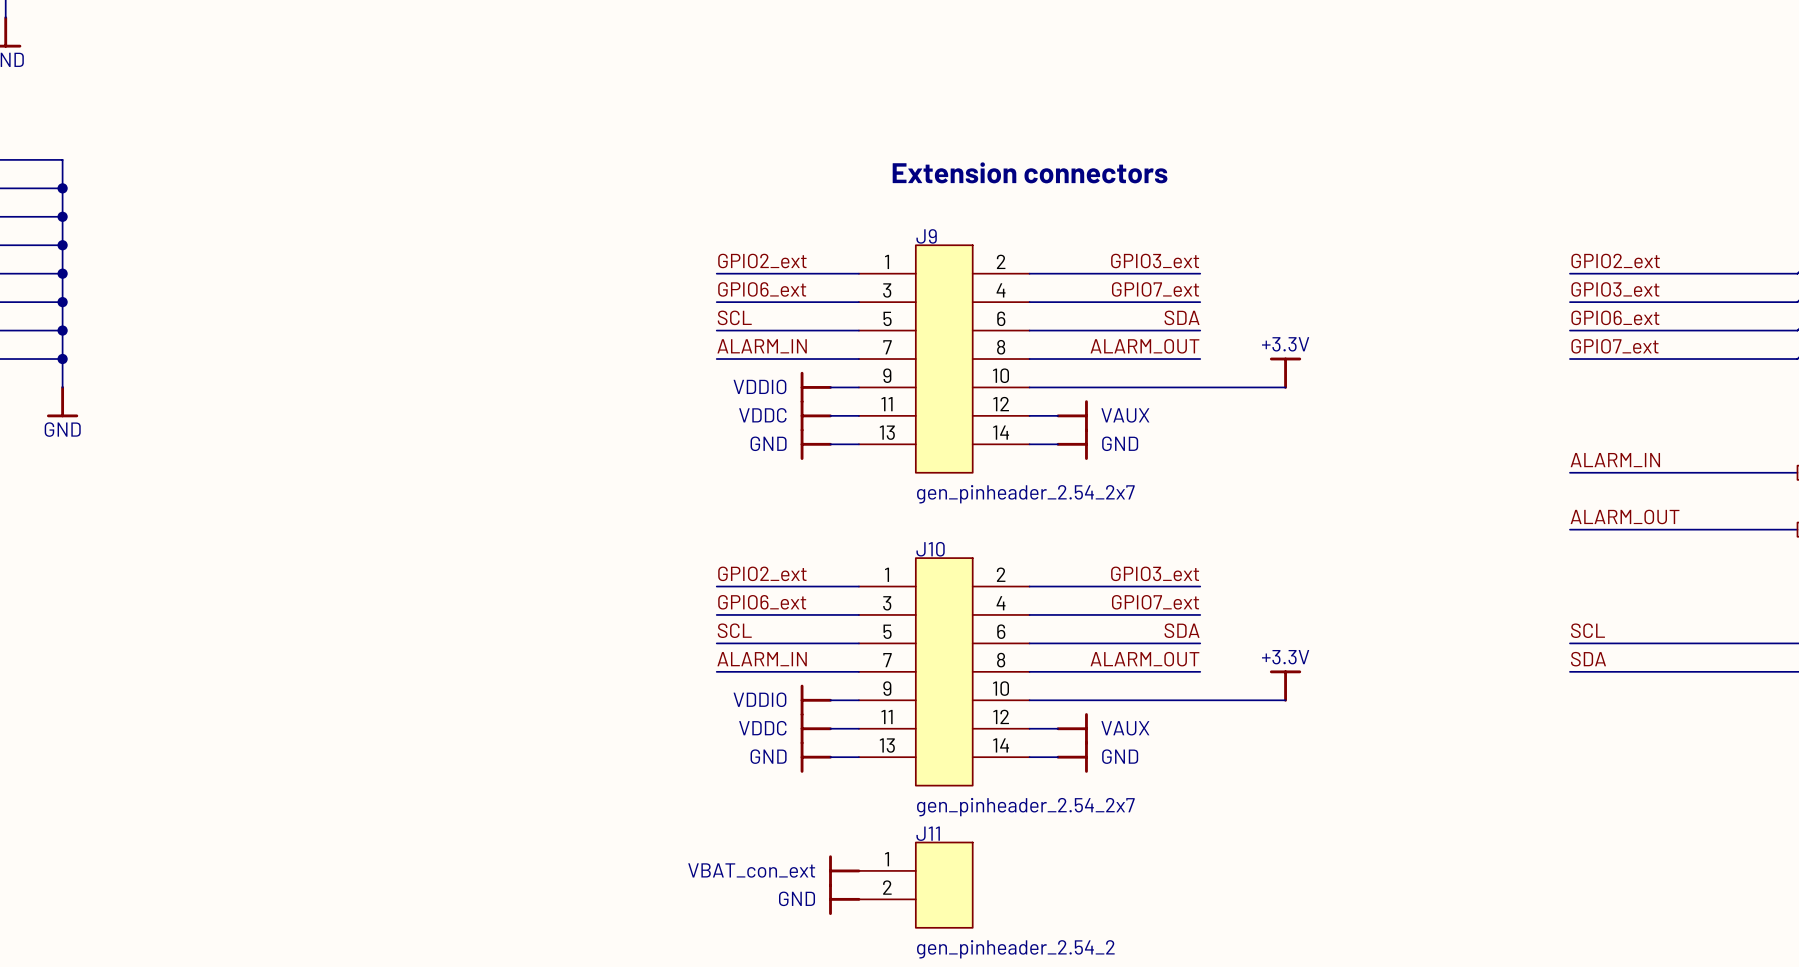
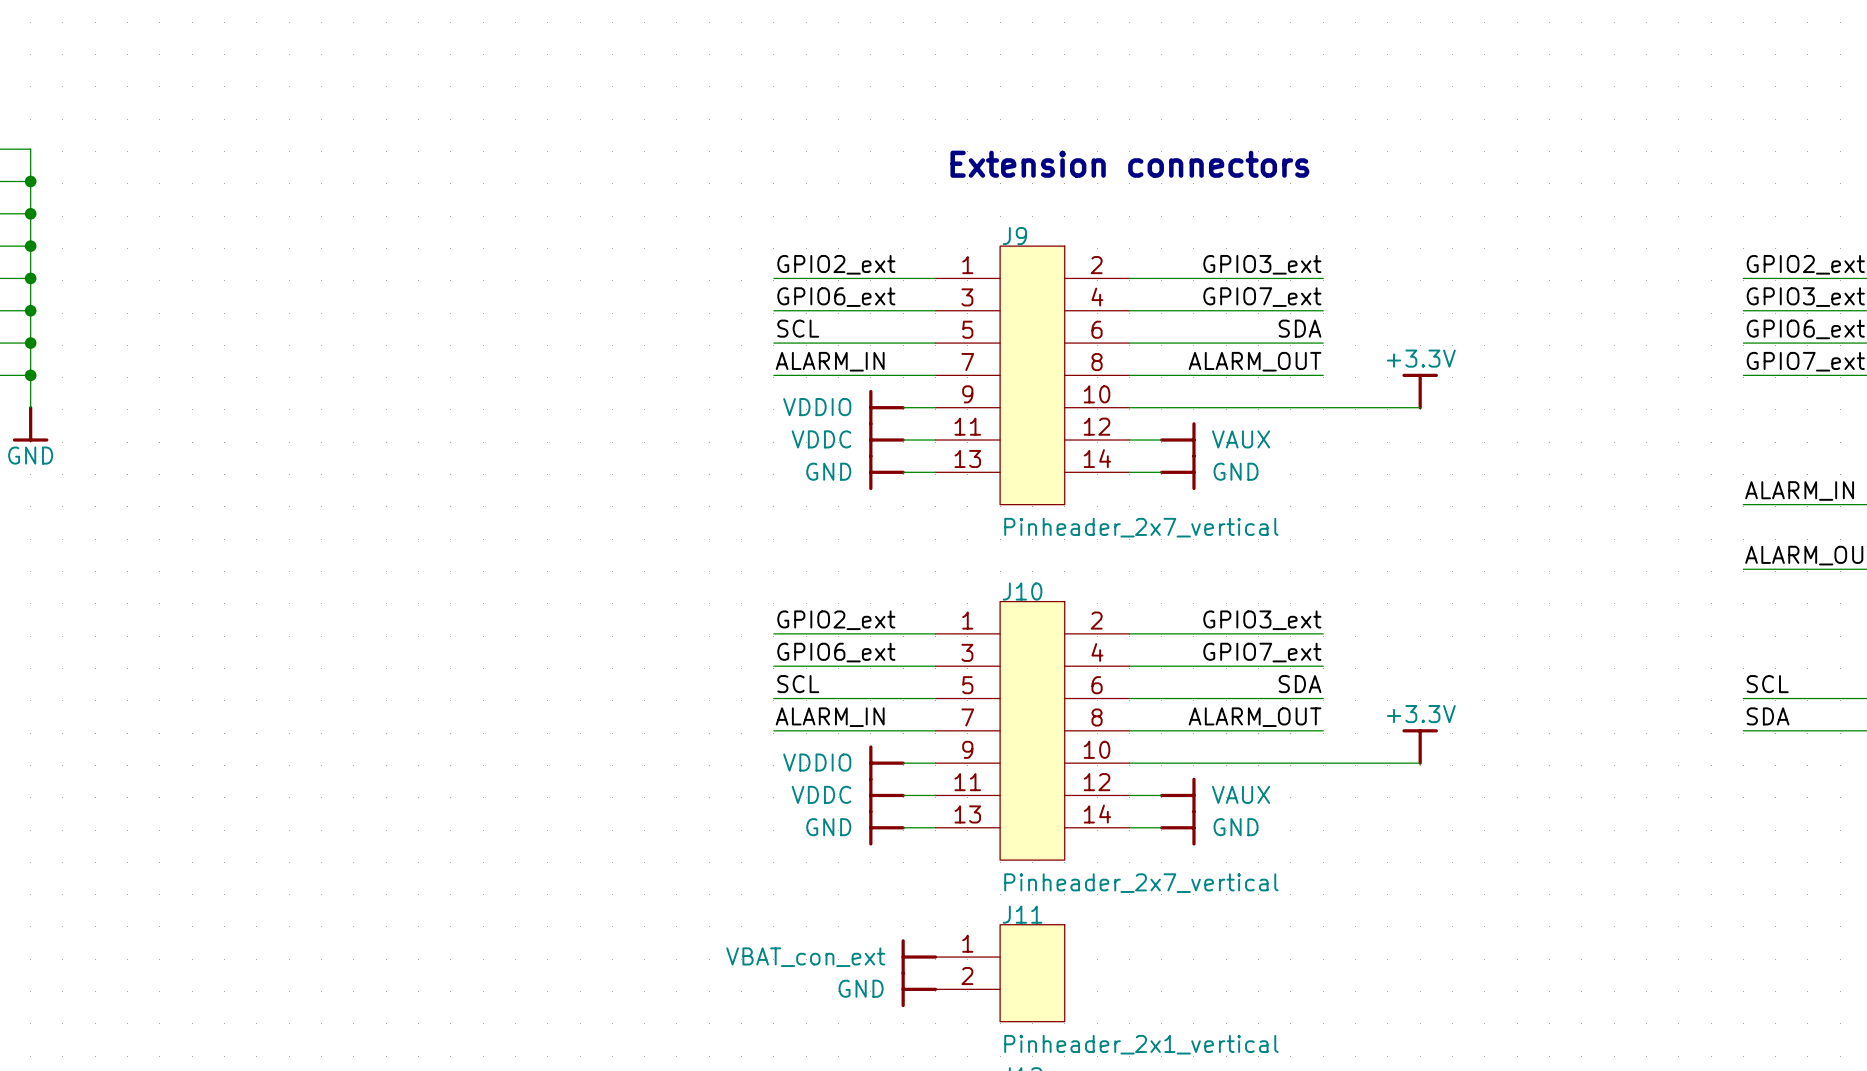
J9 value: gen_pinheader_2.54_2x7 (1025, 494) -> Pinheader_2x7_vertical (1141, 527)
J10 value: gen_pinheader_2.54_2x7 (1025, 807) -> Pinheader_2x7_vertical (1141, 883)
J11 value: gen_pinheader_2.54_2 (1015, 949) -> Pinheader_2x1_vertical (1141, 1044)

